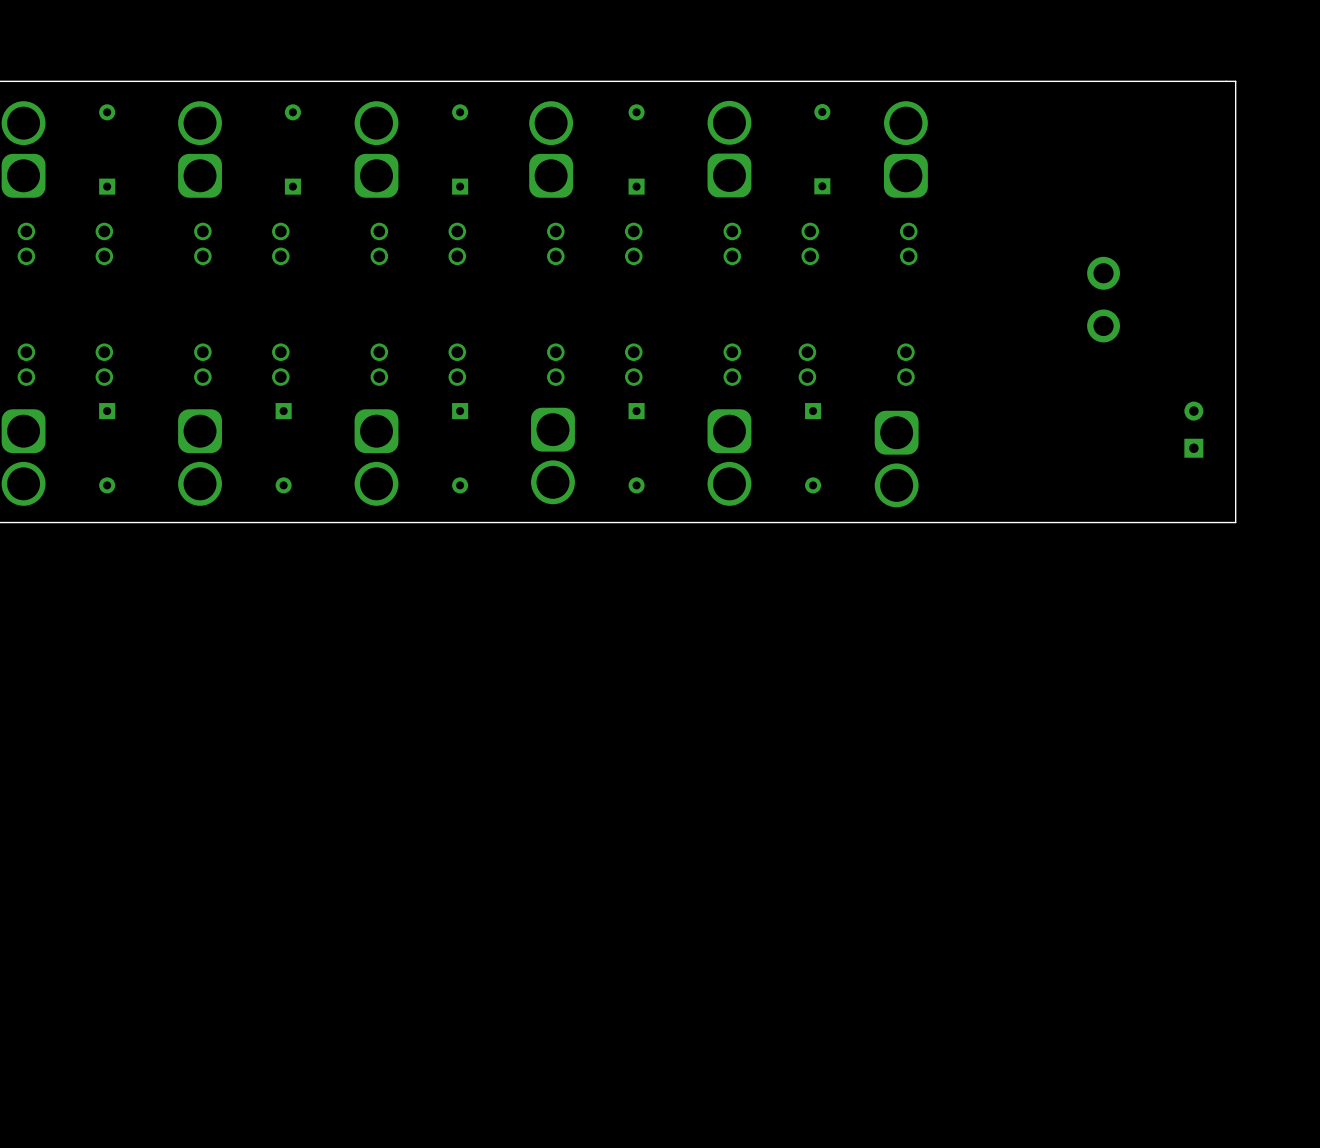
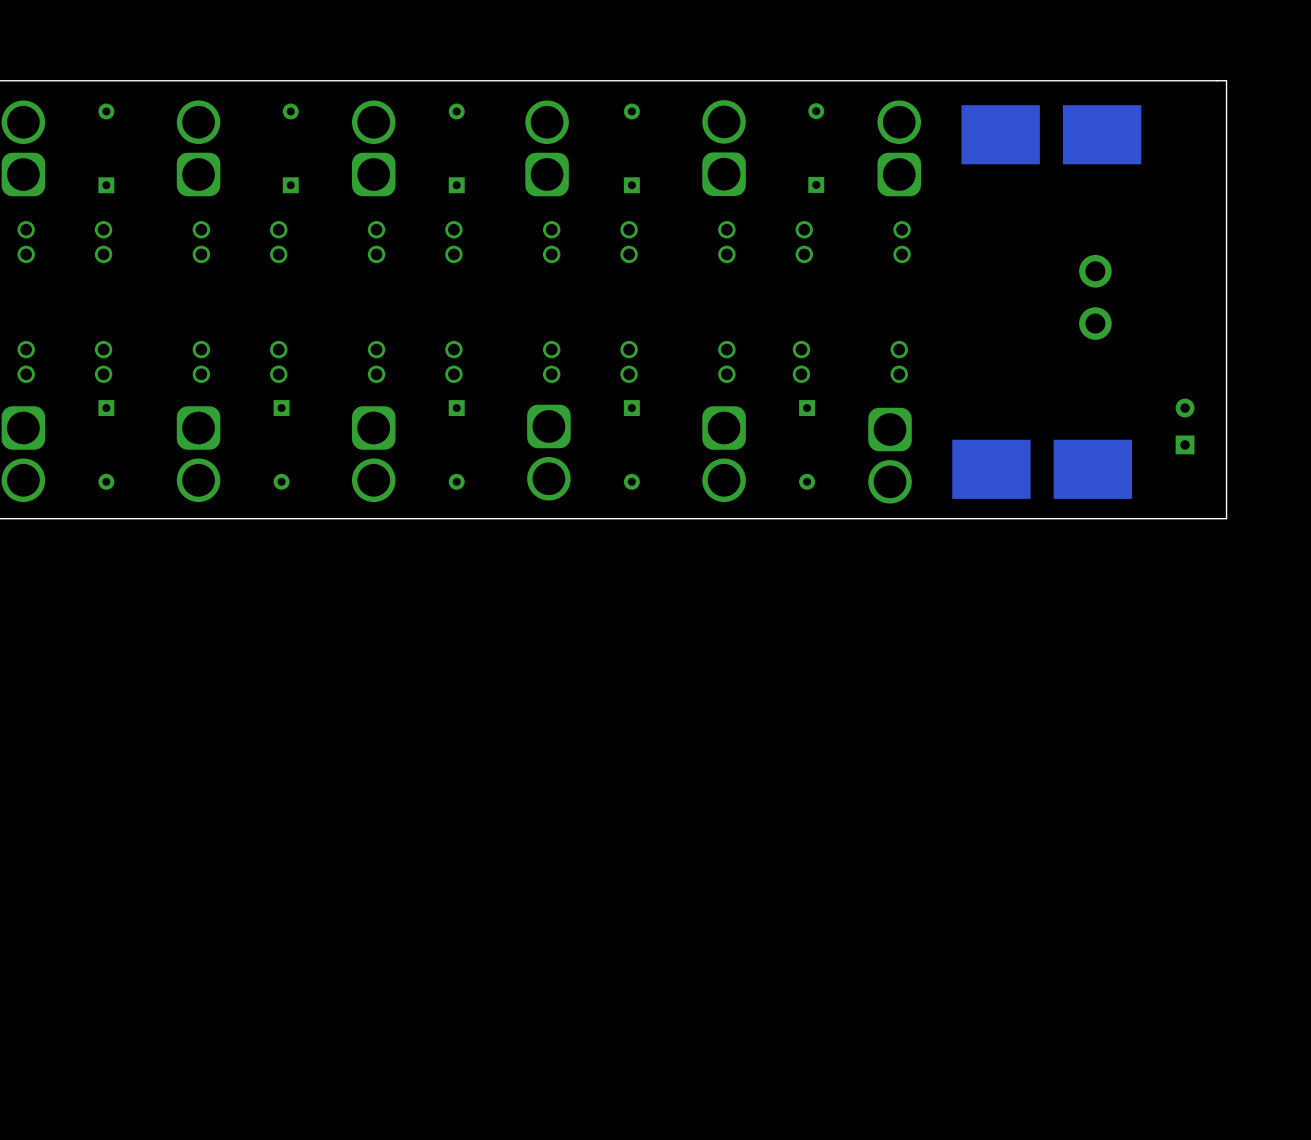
part: none -> (1000, 134)
part: none -> (1102, 134)
part: none -> (991, 469)
part: none -> (1092, 469)

